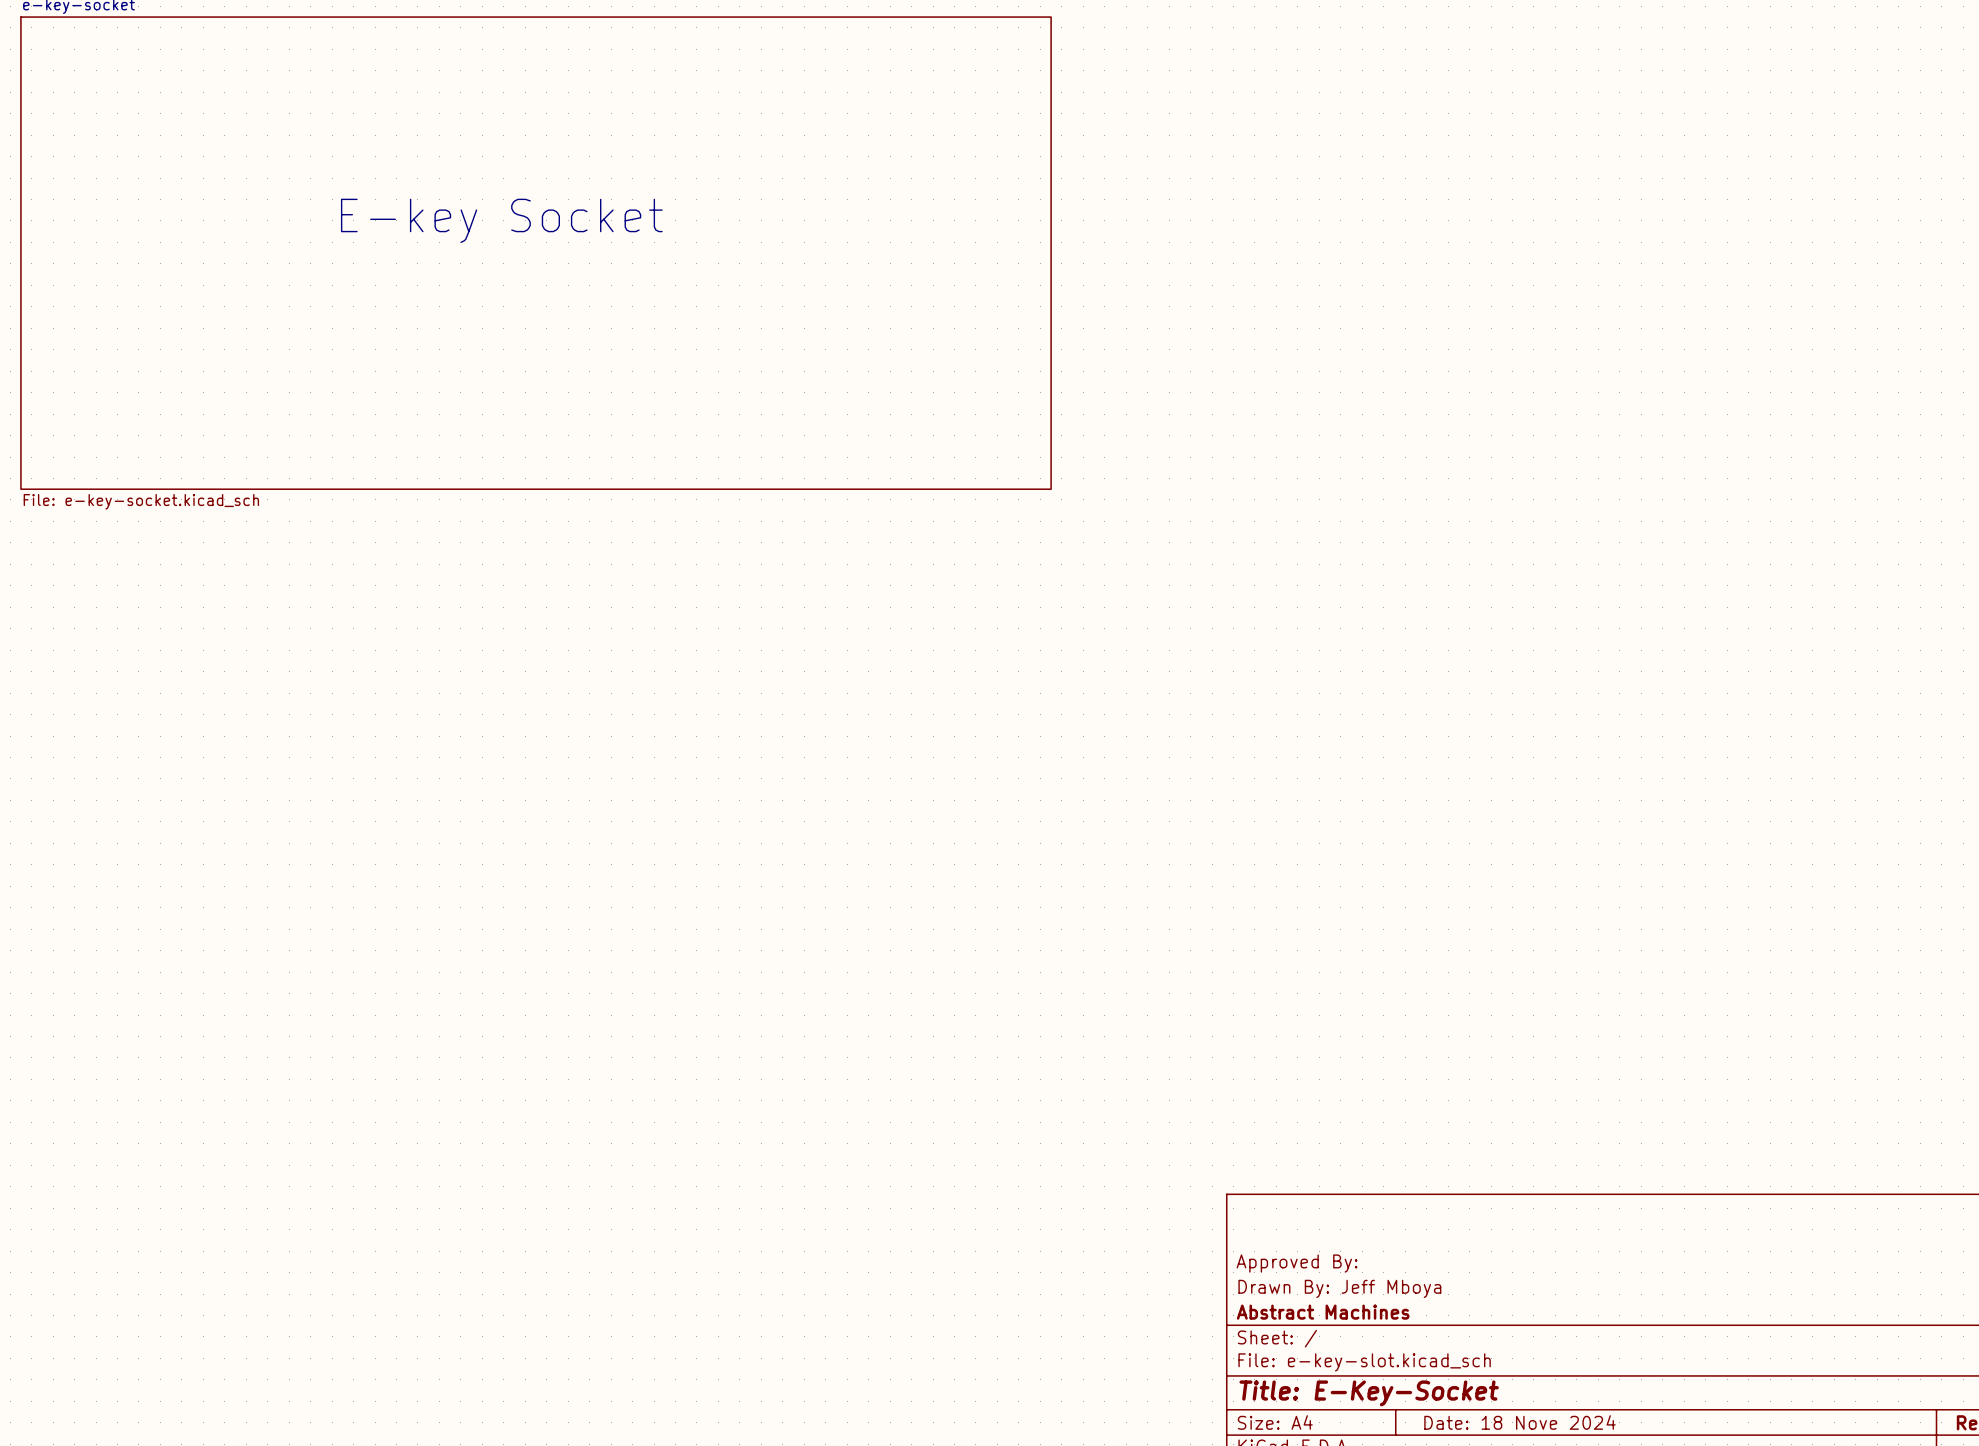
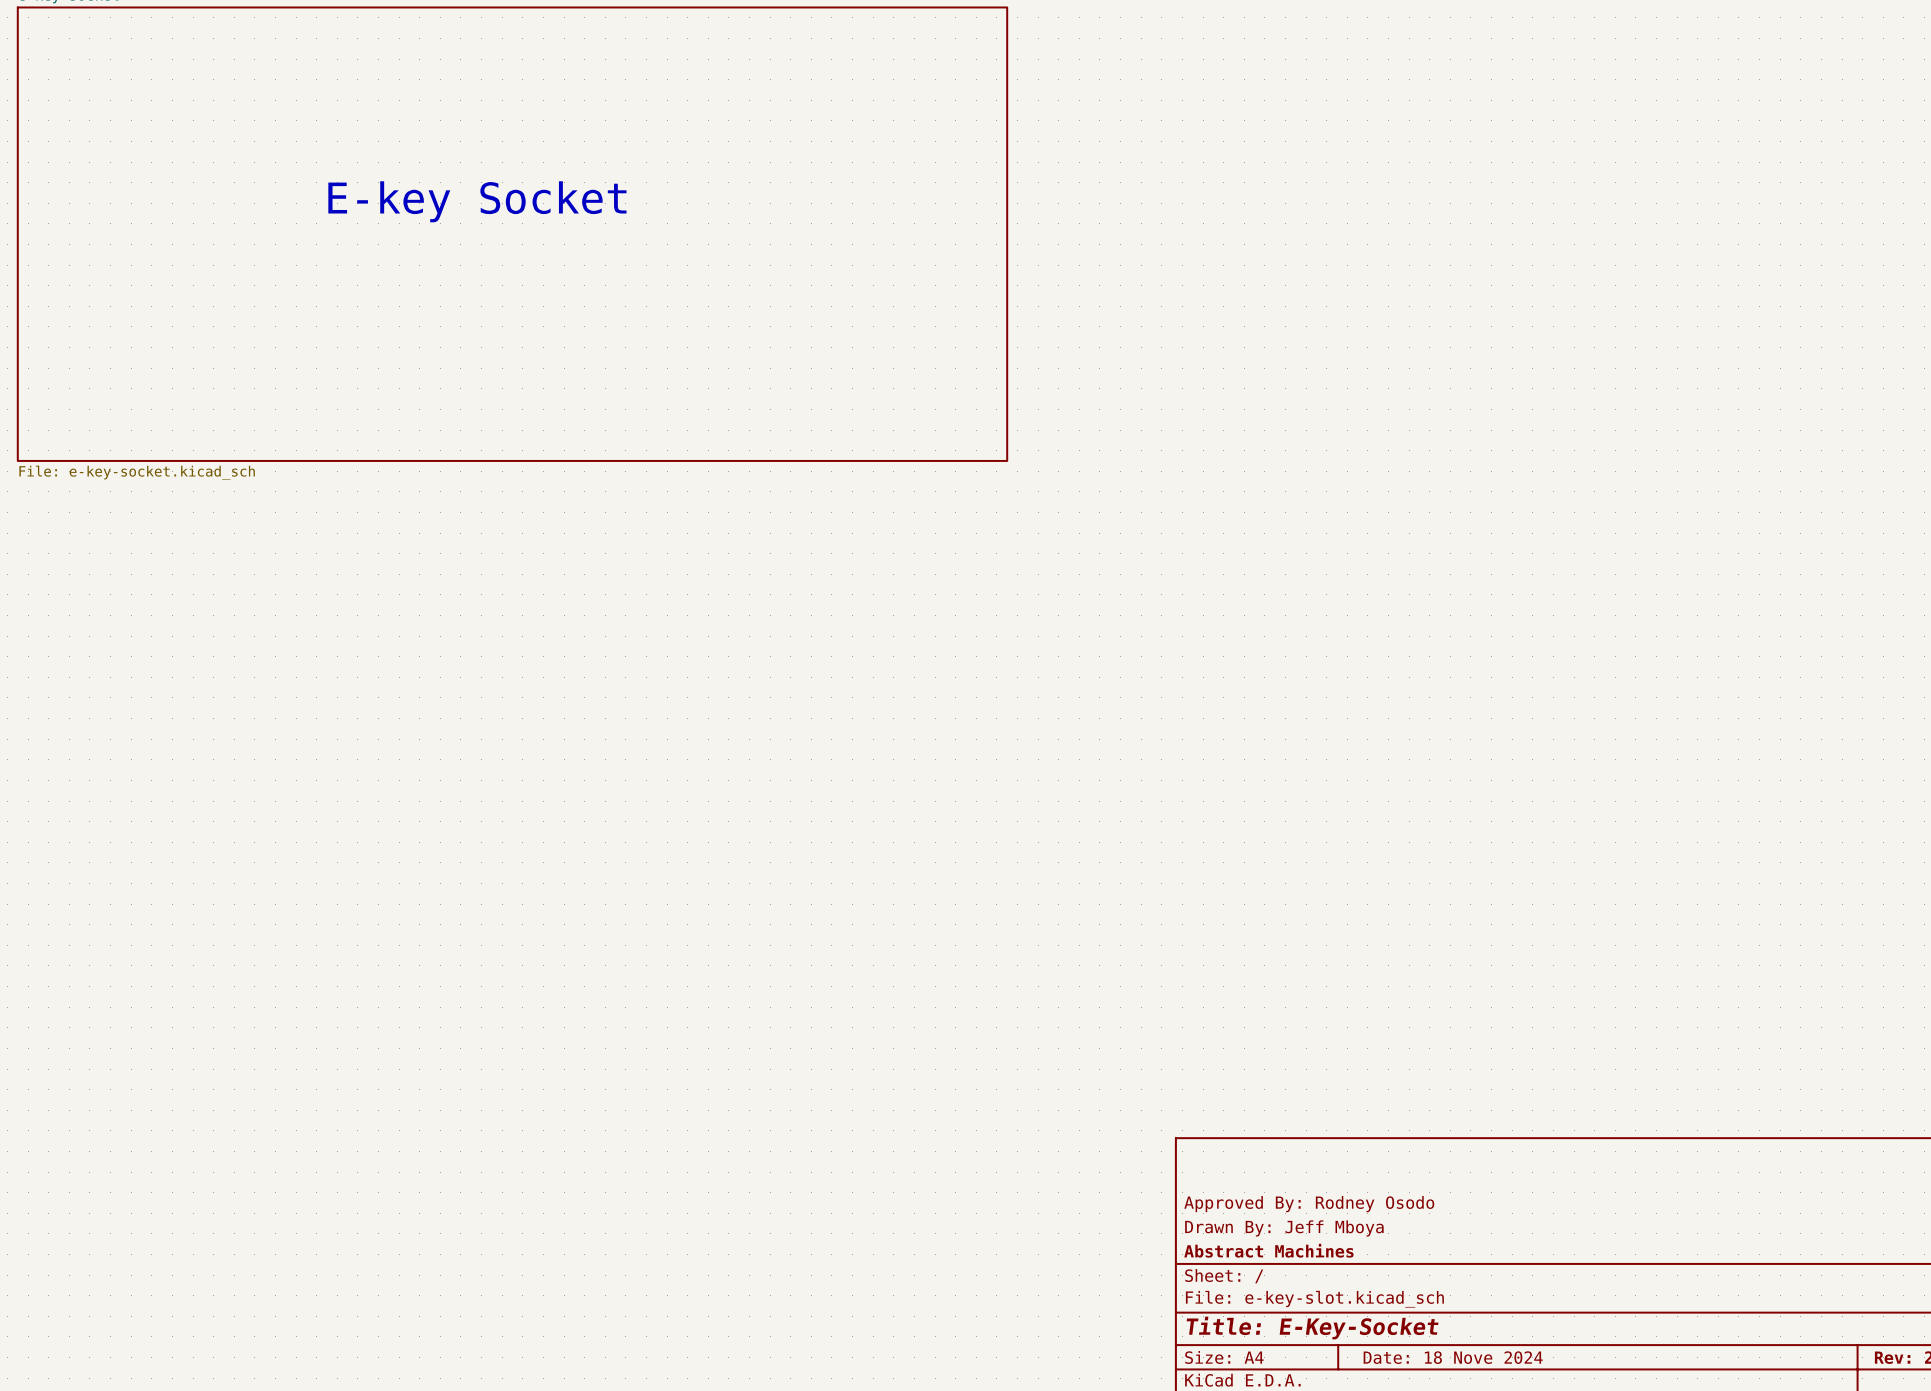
title block: Approved By: (1297, 1263) -> Approved By: Rodney Osodo (1309, 1204)

